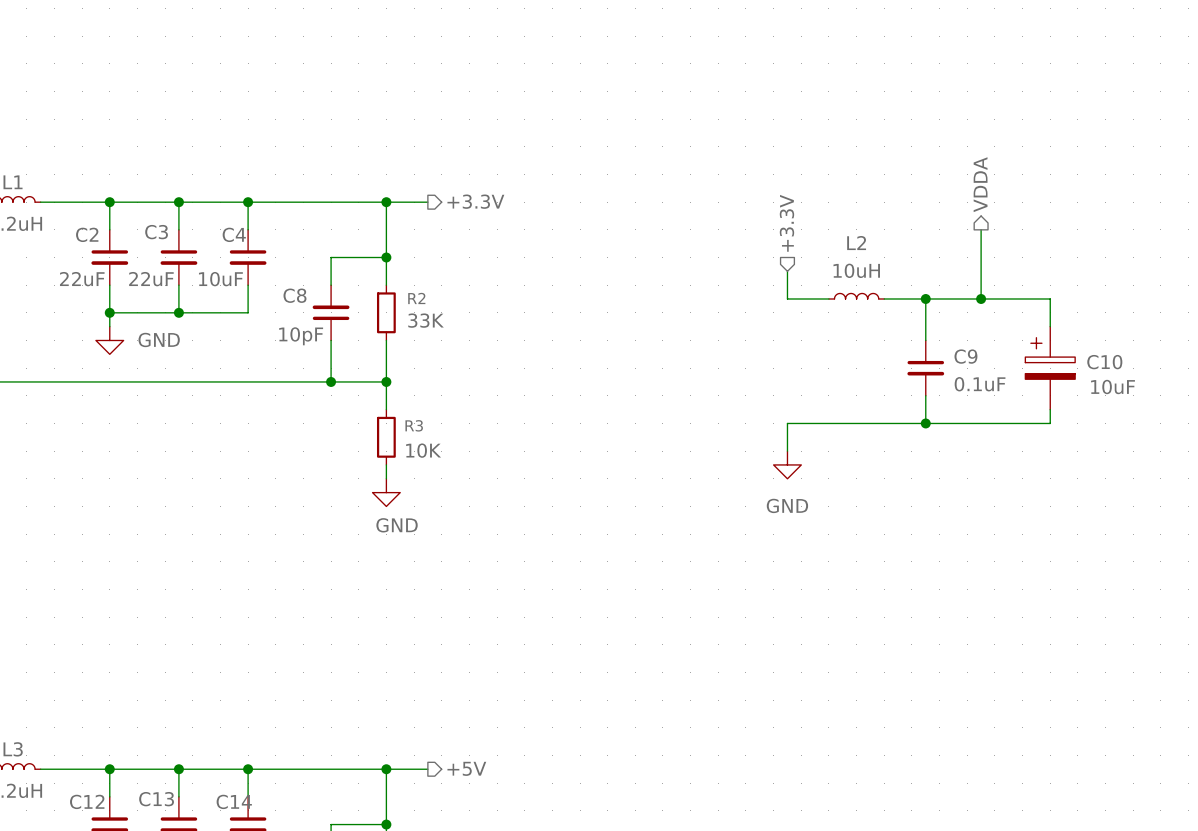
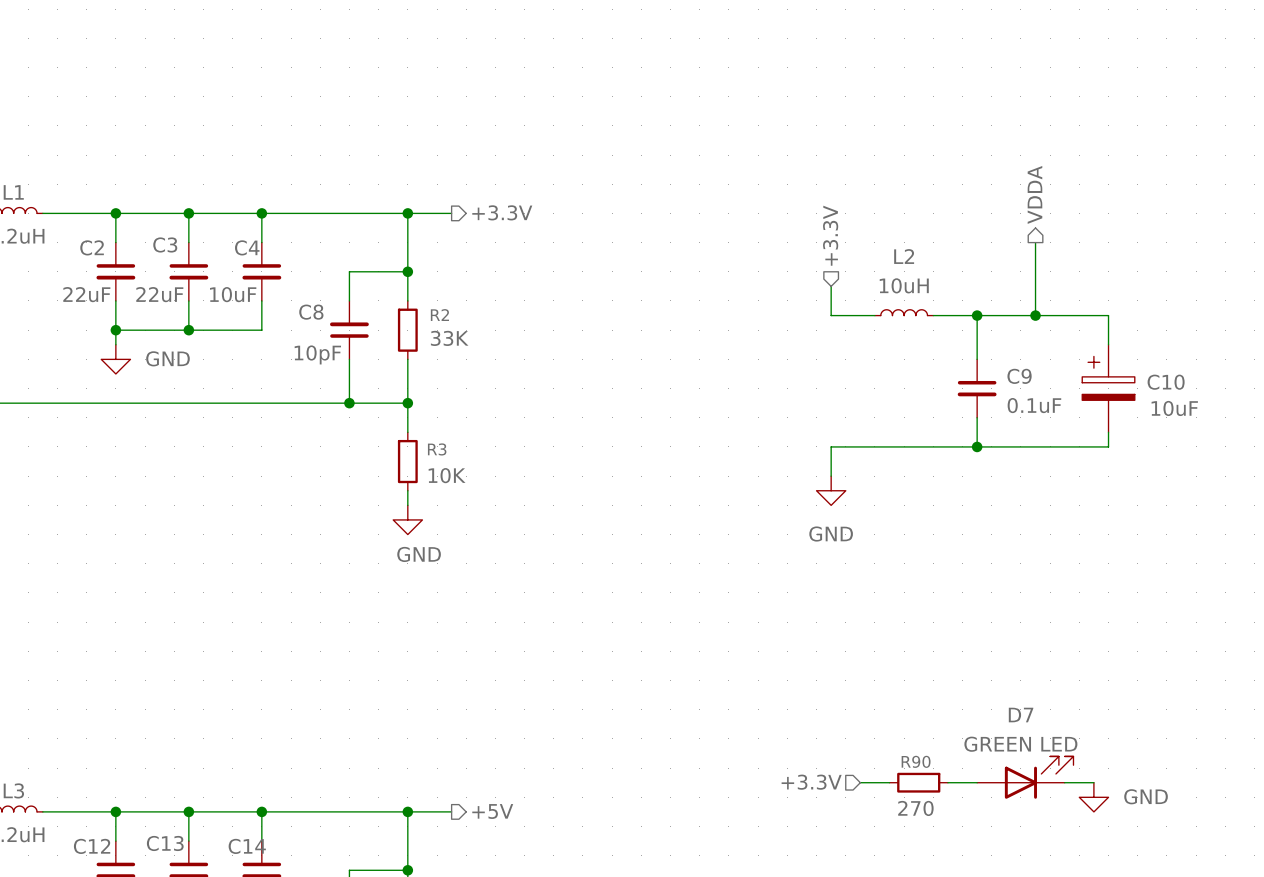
D7: none -> GREEN LED (1025, 777)
hierarchical label: none -> +3.3V (811, 782)
wire: none -> (860, 782) (889, 782)
R90: none -> 270 (918, 782)
wire: none -> (947, 782) (977, 782)
wire: none -> (1064, 782) (1093, 782)
power symbol: none -> GND (1093, 797)

